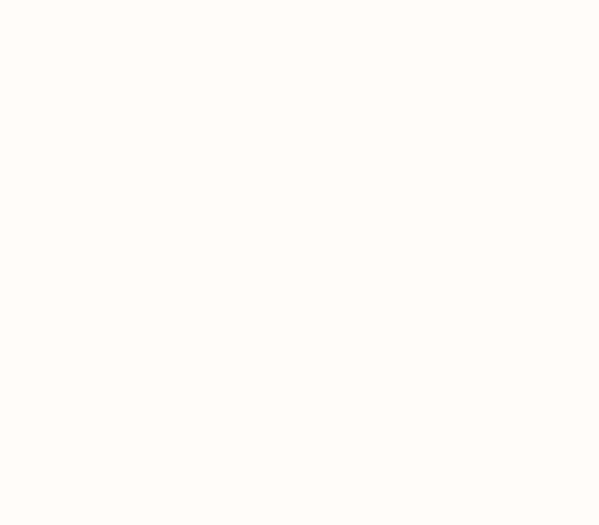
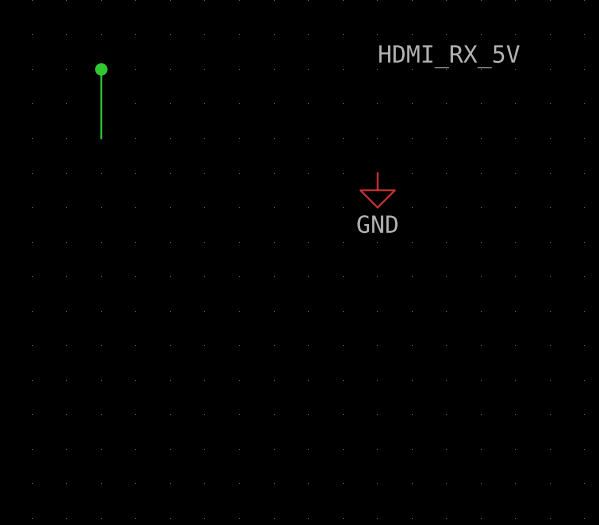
label: none -> HDMI_RX_5V (449, 56)
wire: none -> (101, 69) (101, 138)
junction: none -> (101, 69)
power symbol: none -> GND (377, 190)

